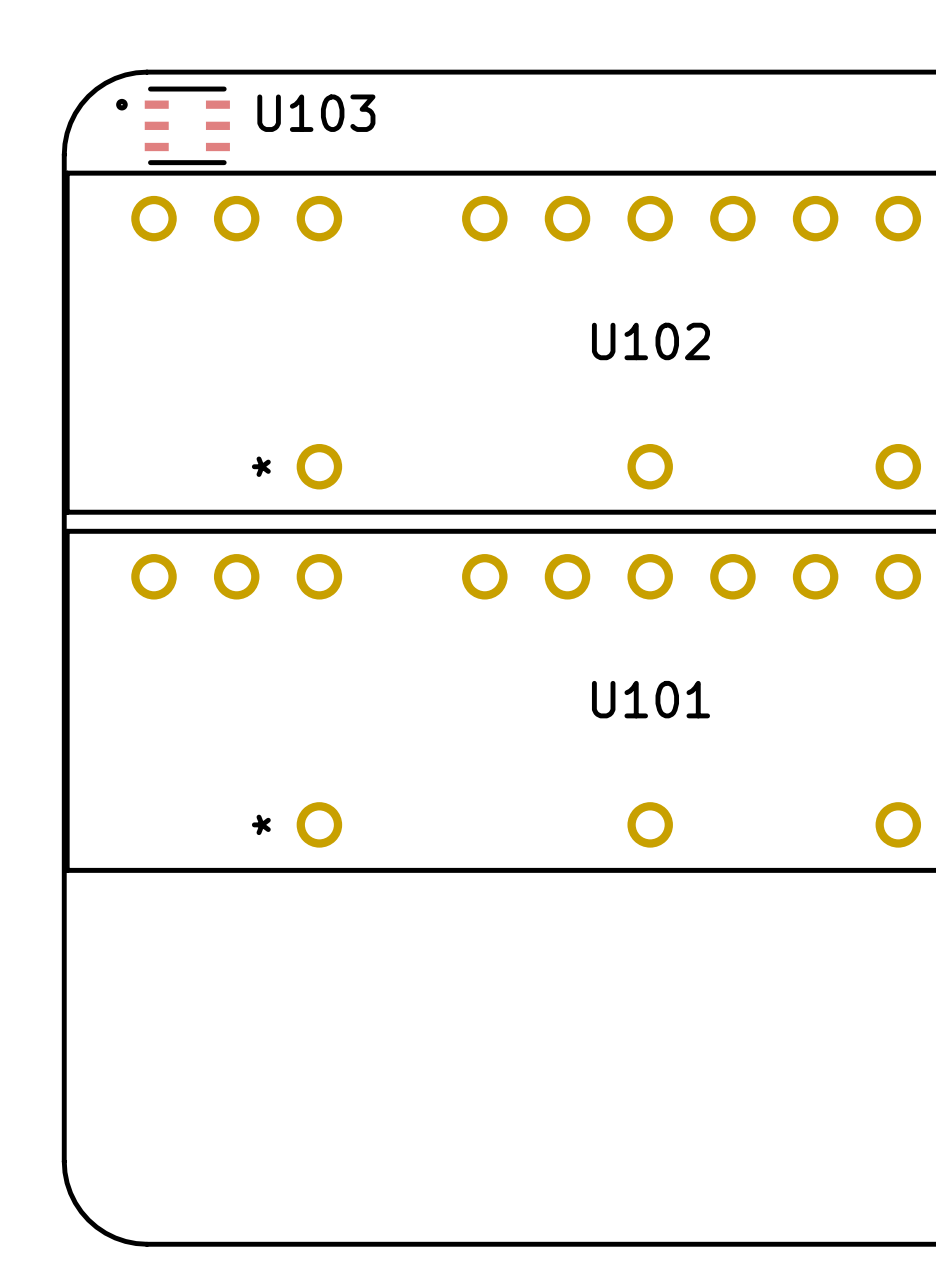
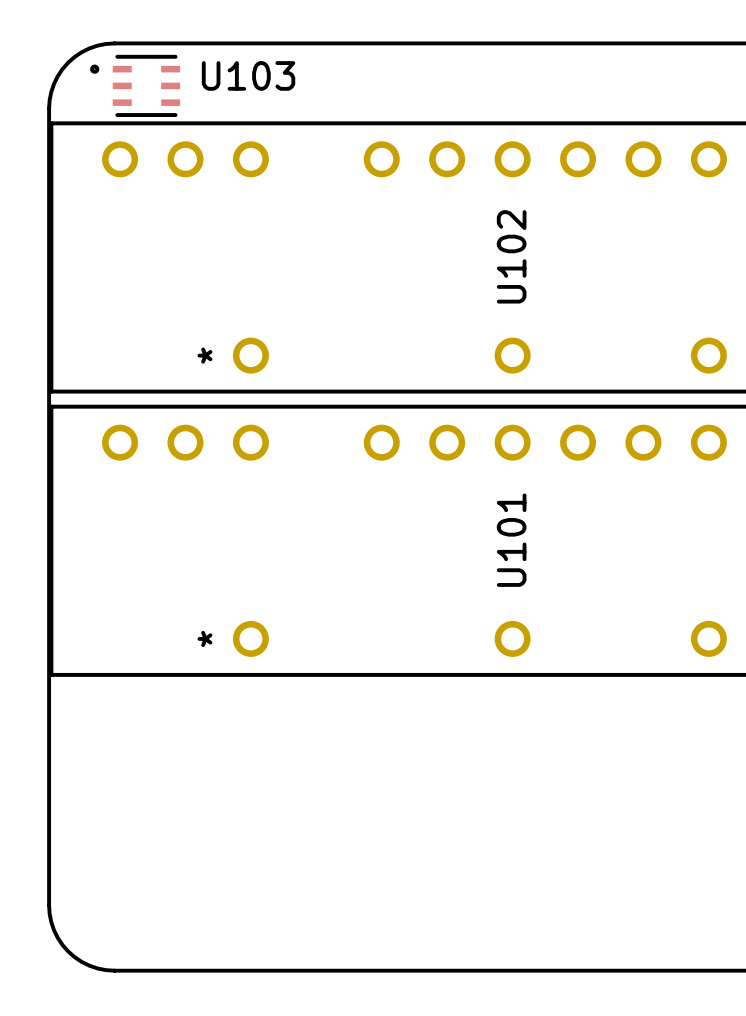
U102 name rotation: 0° (650, 341) -> 90° counterclockwise (511, 256)
U101 name rotation: 0° (650, 699) -> 90° counterclockwise (511, 540)

